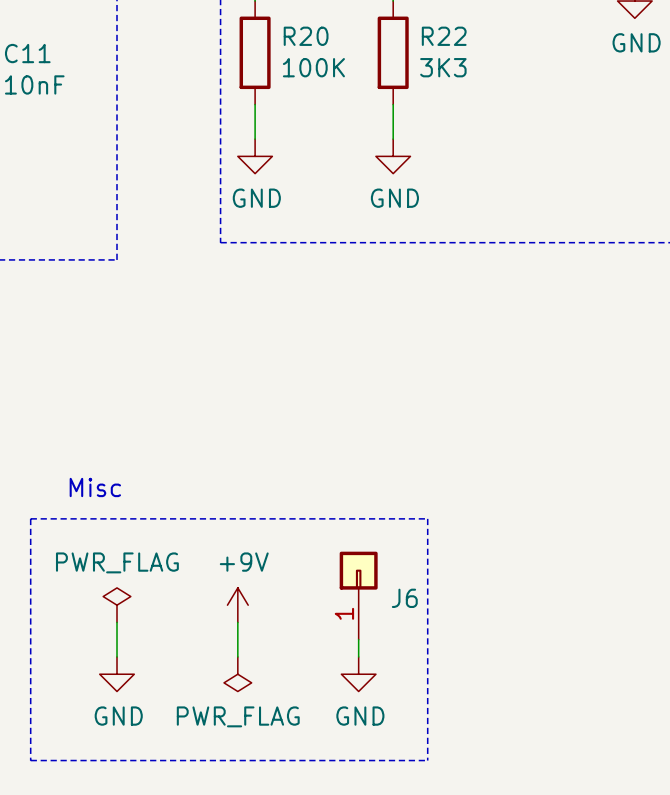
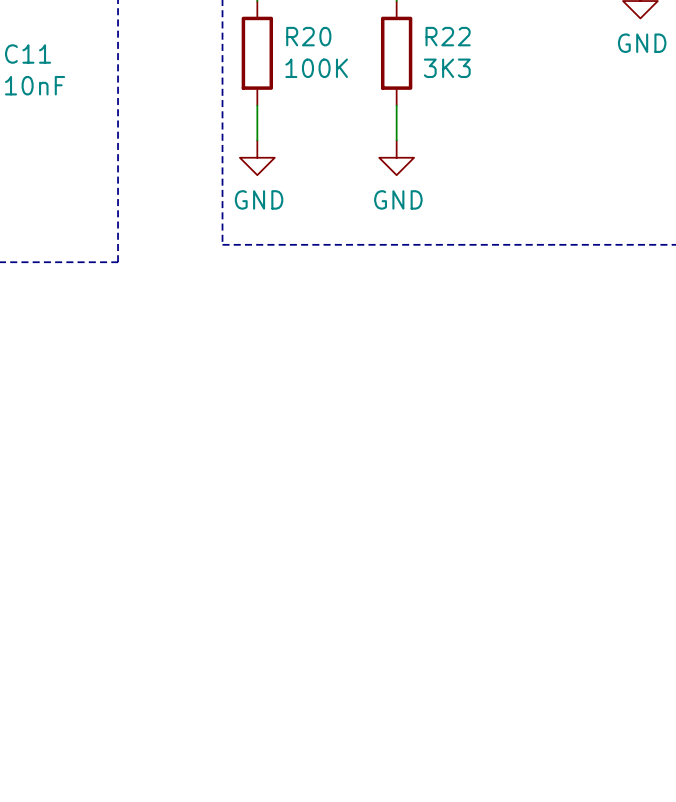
text: Misc (95, 487) -> none
line: (30, 518) (30, 760) (427, 760) (427, 518) (30, 518) -> none
J6: (358, 595) -> none
power symbol: PWR_FLAG (117, 605) -> none
power symbol: +9V (237, 605) -> none
wire: (117, 622) (117, 656) -> none
wire: (237, 622) (237, 656) -> none
wire: (358, 639) (358, 656) -> none
power symbol: GND (117, 674) -> none
power symbol: PWR_FLAG (237, 674) -> none
power symbol: GND (358, 674) -> none

